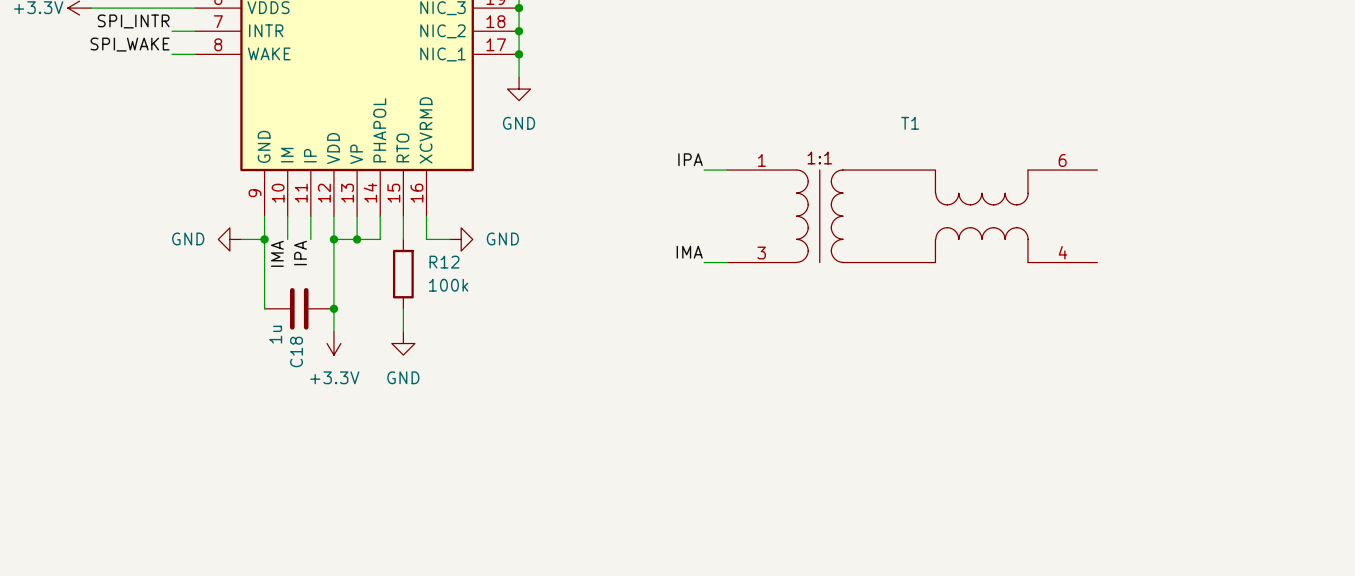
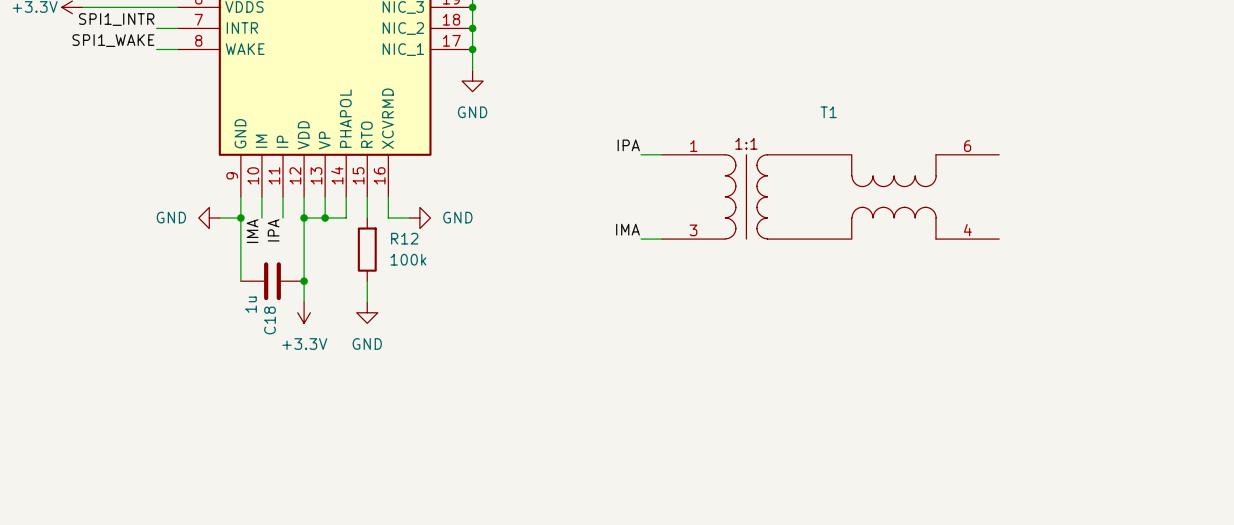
label: SPI_INTR (133, 21) -> SPI1_INTR (116, 19)
label: SPI_WAKE (130, 44) -> SPI1_WAKE (113, 40)

